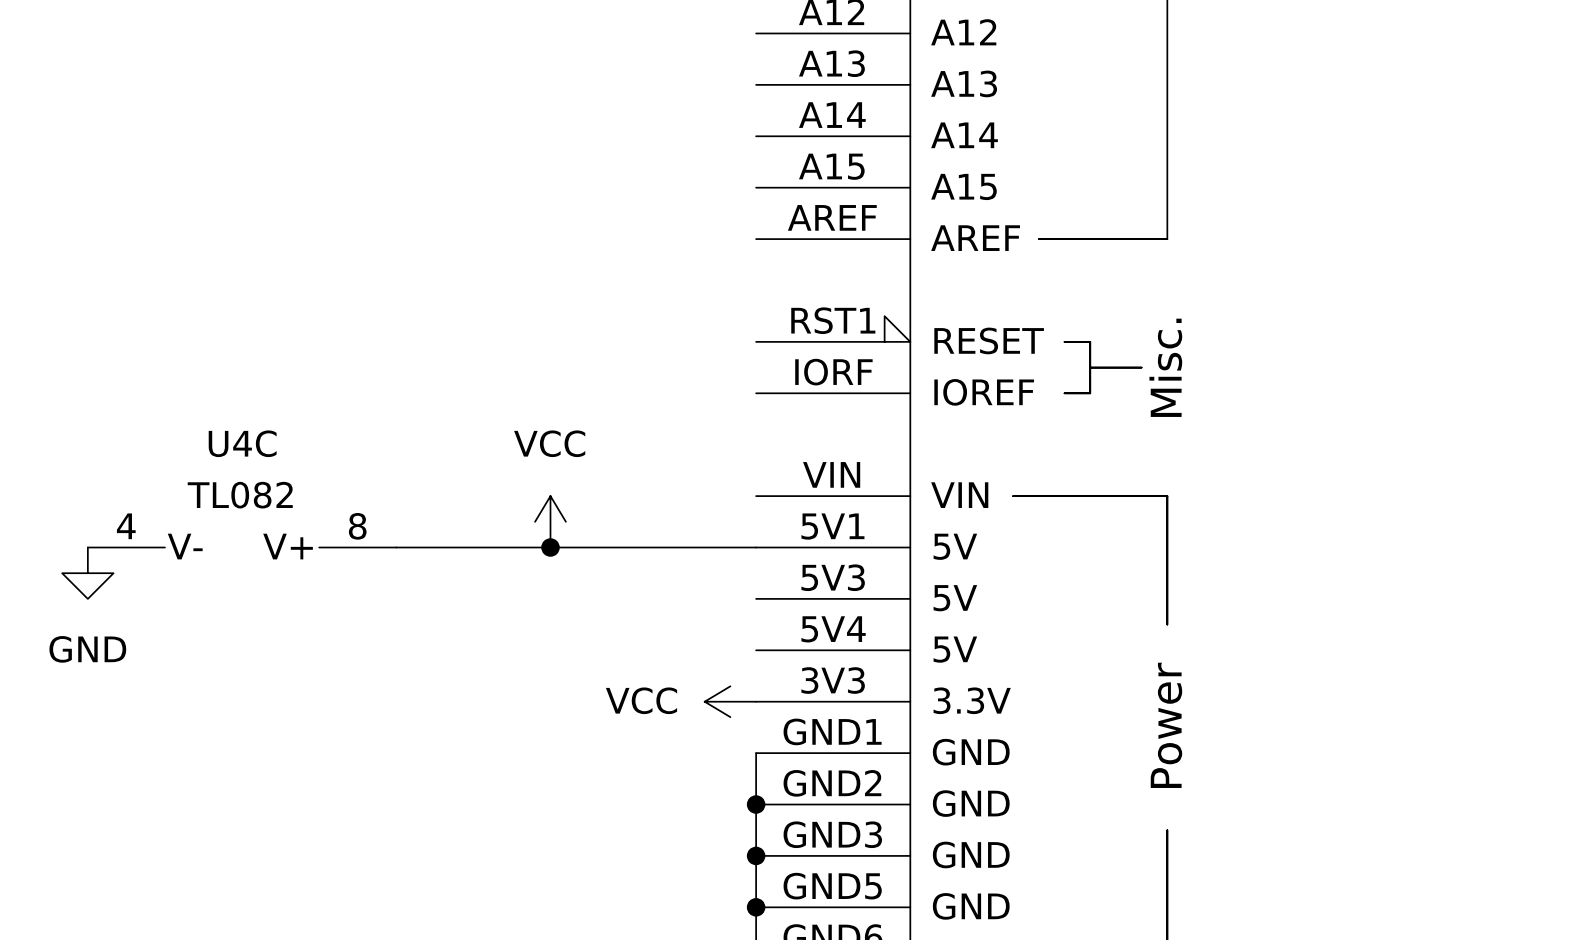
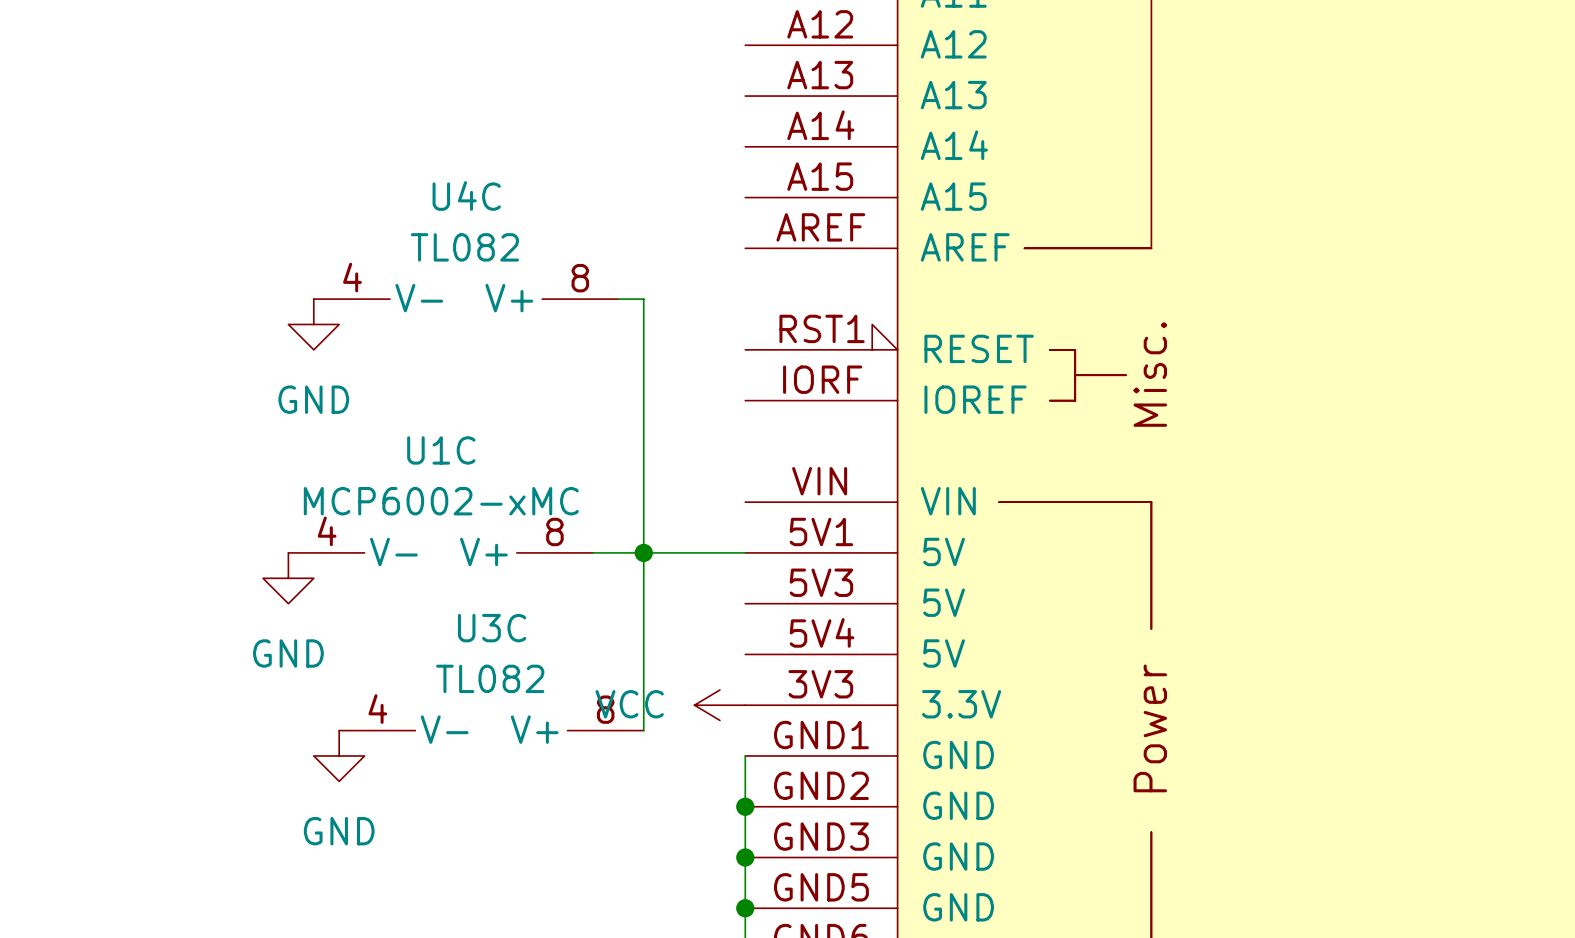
wire: none -> (618, 299) (643, 299) (643, 730)
power symbol: none -> GND (313, 324)
power symbol: VCC (550, 521) -> none
U4C position: (242, 547) -> (466, 299)
wire: (396, 547) (601, 547) -> none
U1C: none -> MCP6002-xMC (440, 552)
junction position: (550, 547) -> (643, 552)
power symbol: GND (87, 573) -> none
power symbol: none -> GND (288, 578)
U3C: none -> TL082 (491, 730)
power symbol: none -> GND (339, 755)

